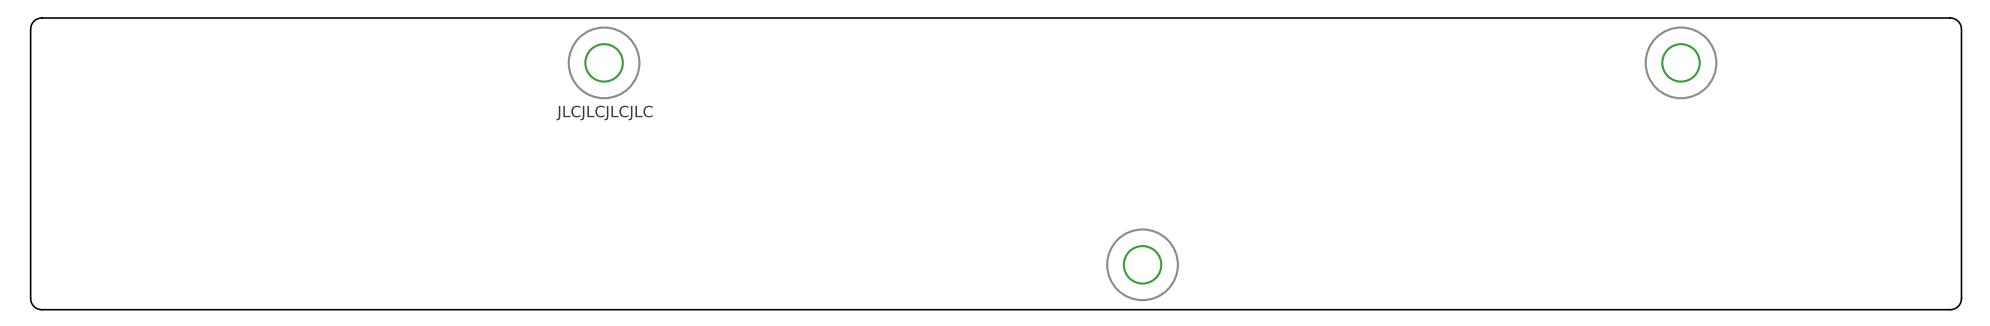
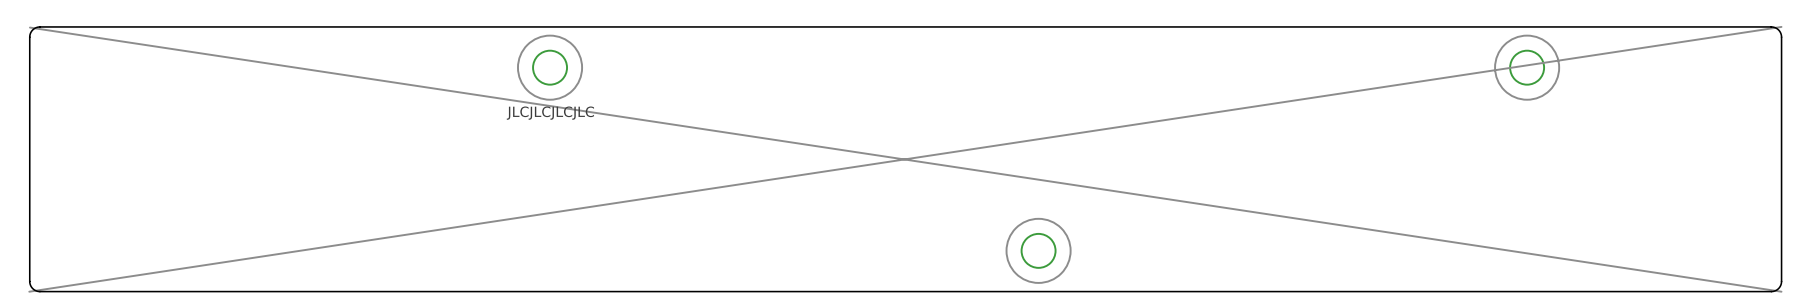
line: none -> (1781, 26) (29, 291)
line: none -> (29, 27) (1781, 291)

